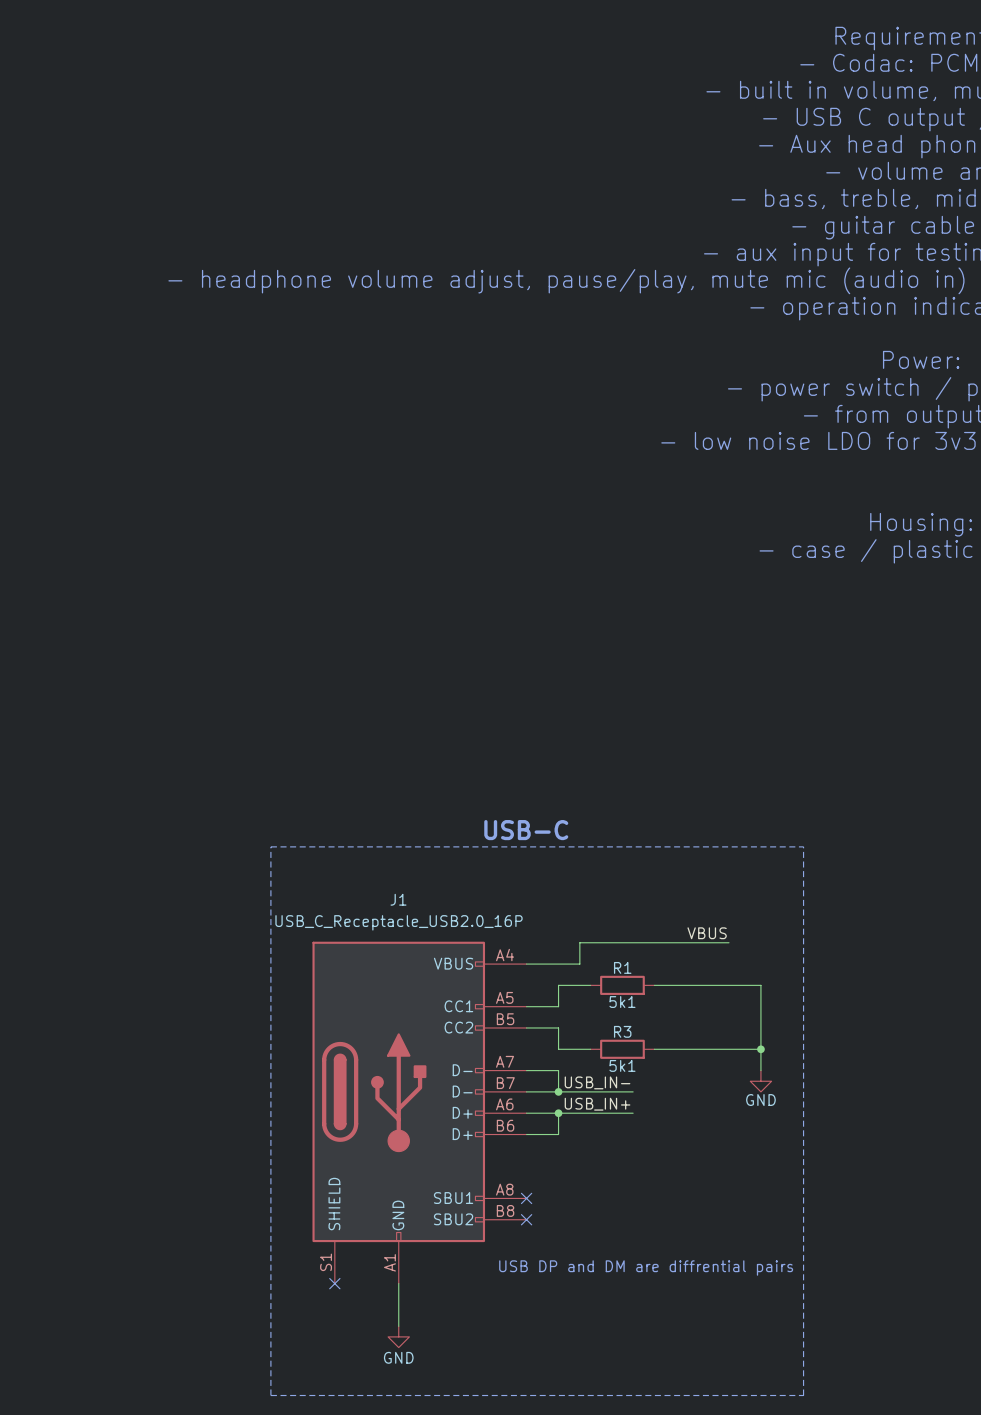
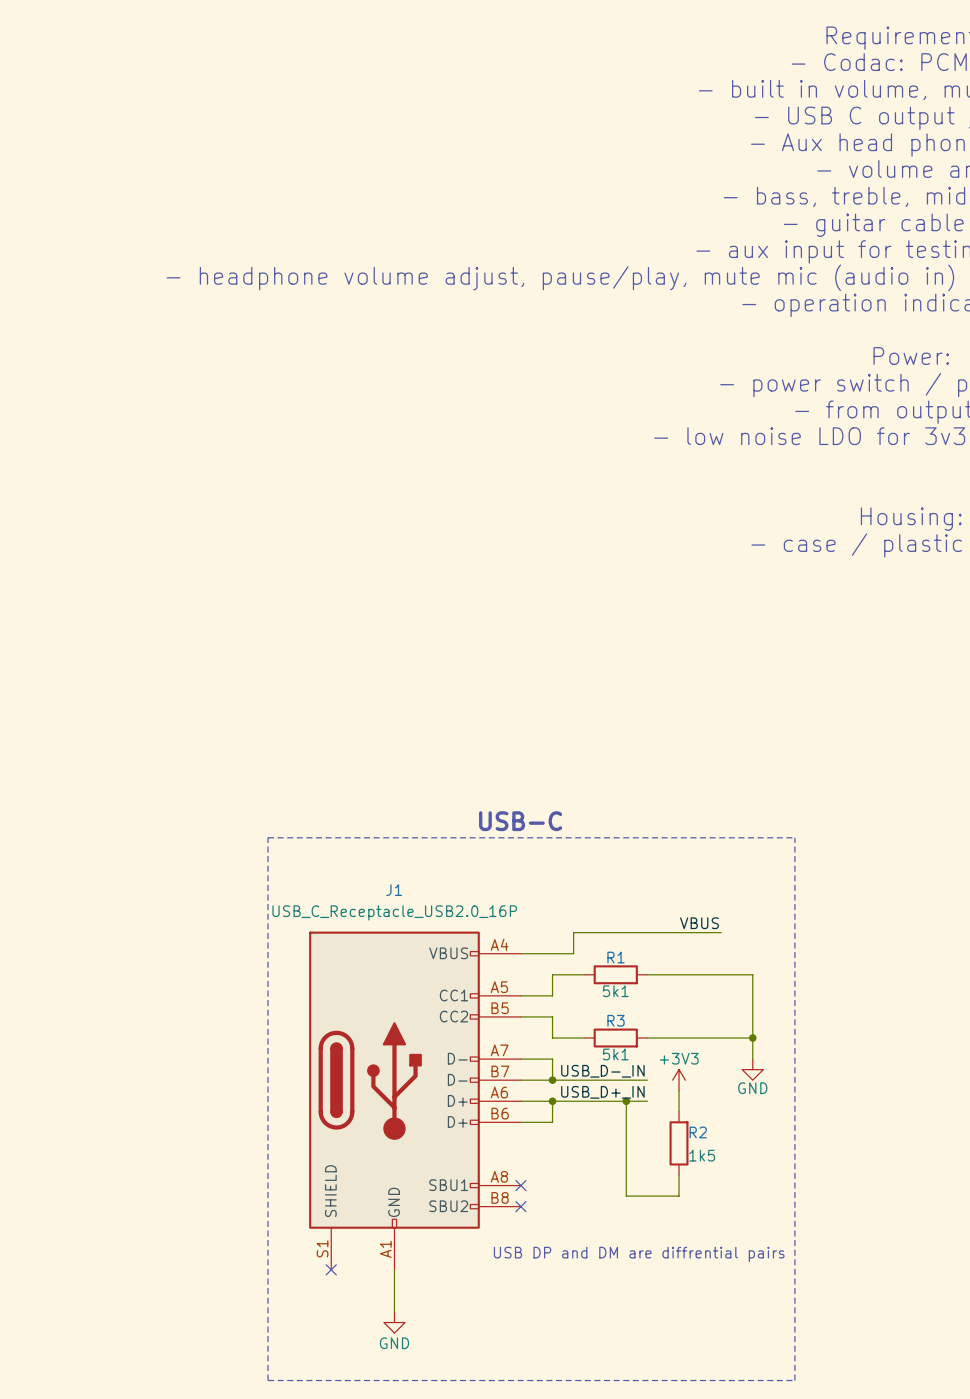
label: USB_IN- (597, 1082) -> none
label: none -> USB_D-_IN (602, 1071)
wire: none -> (626, 1080) (647, 1080)
power symbol: none -> +3V3 (679, 1080)
wire: none -> (679, 1090) (679, 1111)
label: USB_IN+ (597, 1104) -> none
label: none -> USB_D+_IN (602, 1092)
junction: none -> (626, 1101)
wire: none -> (647, 1101) (626, 1101) (626, 1196) (679, 1196) (679, 1175)
R2: none -> 1k5 (679, 1143)

